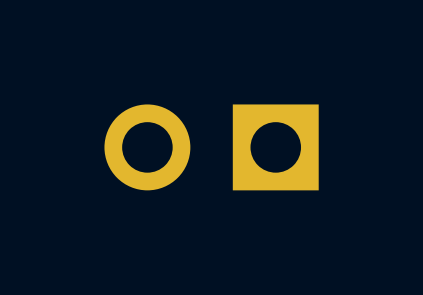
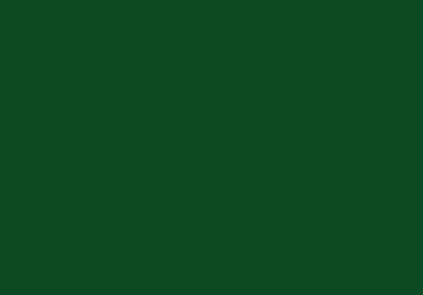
part: (211, 147) -> none

